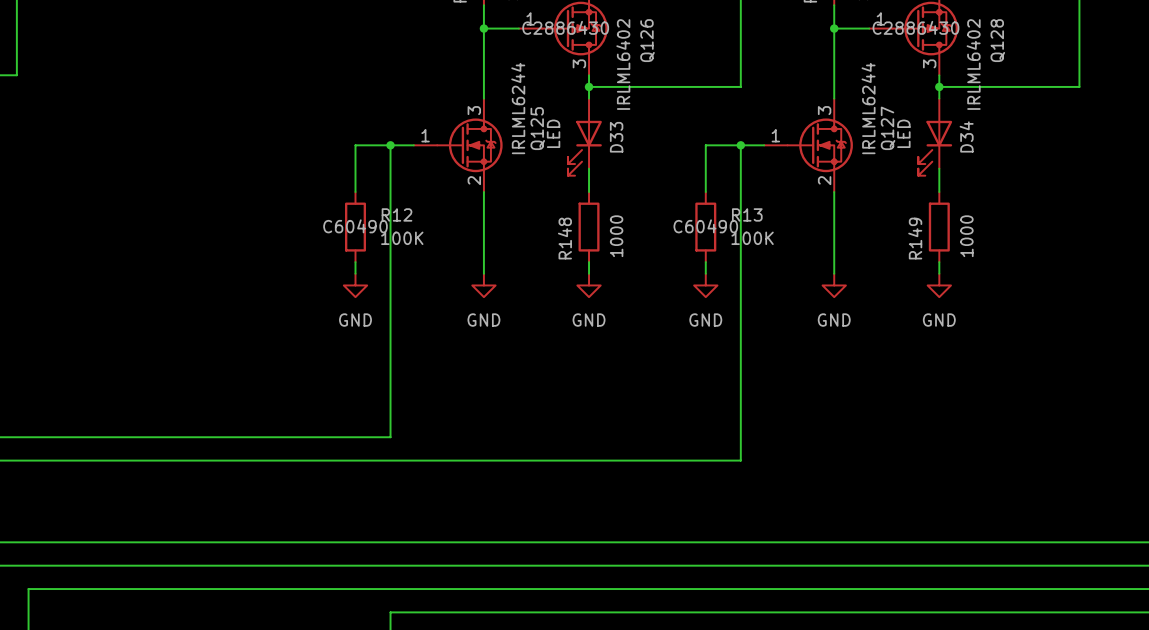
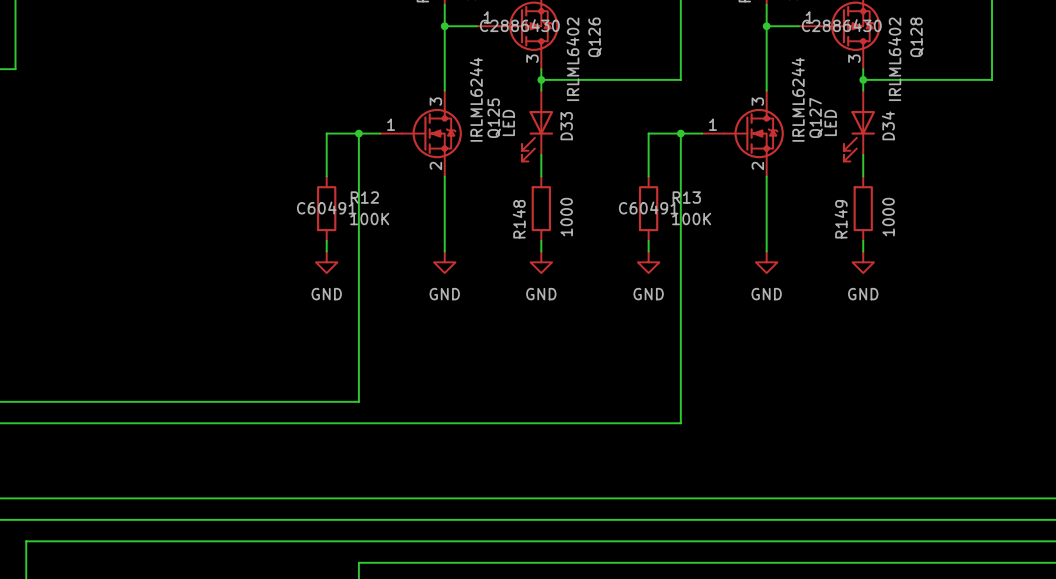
R12 text: C60490 (355, 226) -> C60491 (326, 208)
R13 text: C60490 (705, 226) -> C60491 (648, 208)

